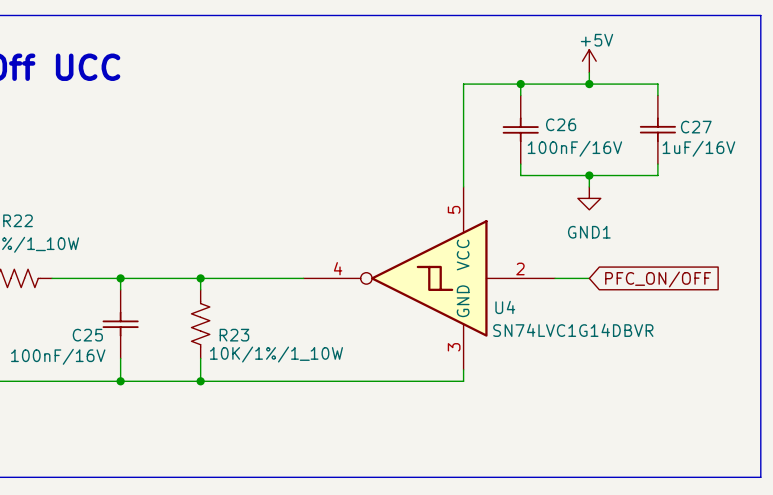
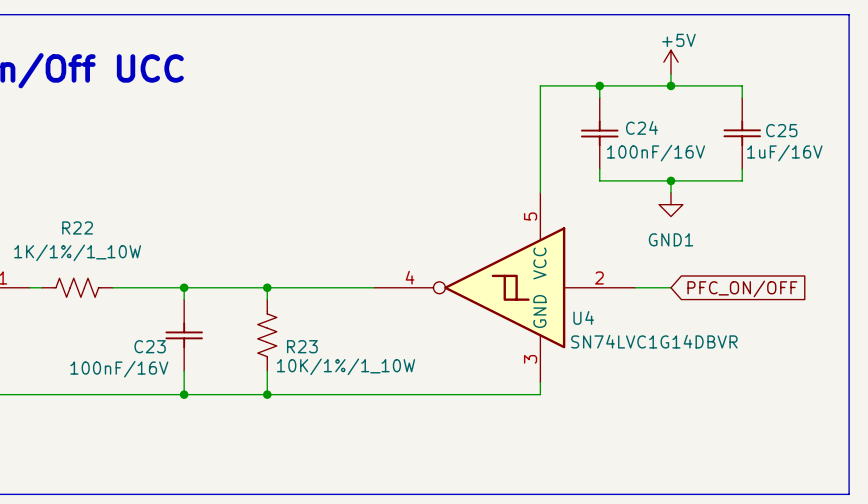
C26 name: C26 (561, 124) -> C24 (641, 127)
C27 name: C27 (696, 127) -> C25 (781, 130)
C25 name: C25 (87, 335) -> C23 (150, 346)

